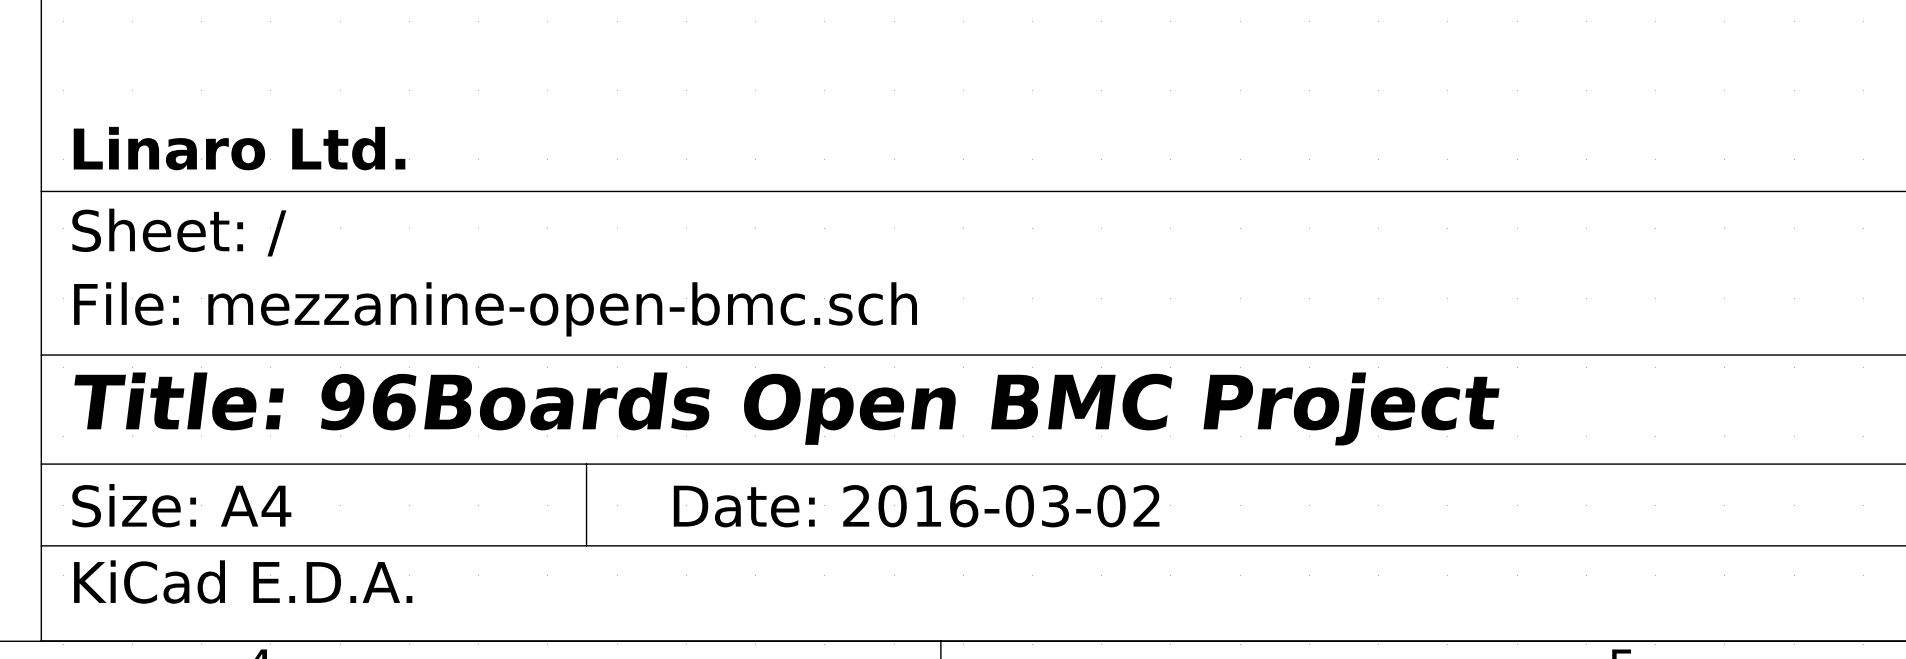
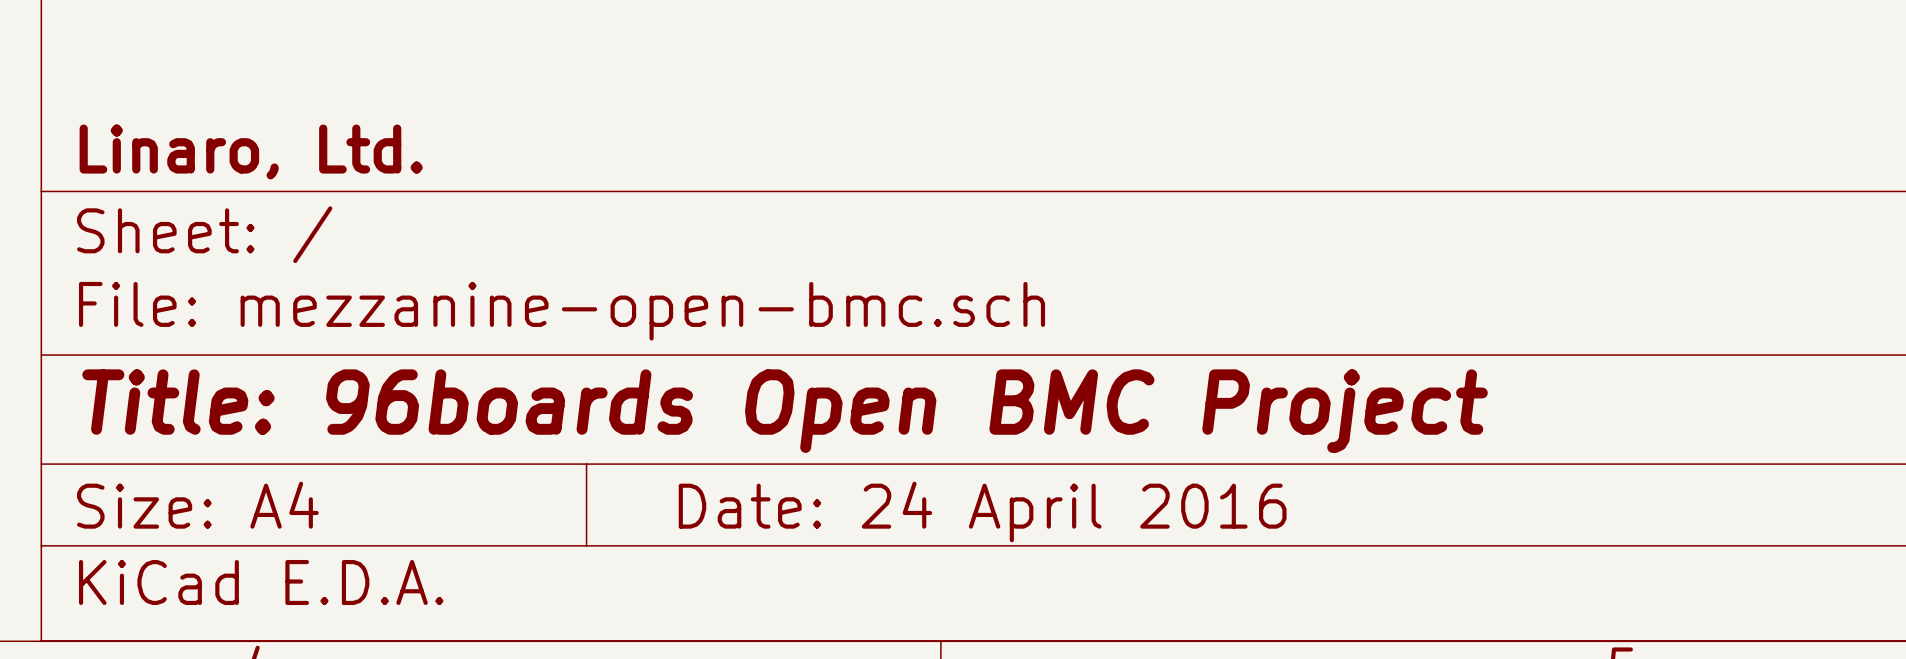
title block: Linaro Ltd. (239, 148) -> Linaro, Ltd. (251, 151)
title block: Title: 96Boards Open BMC Project (786, 408) -> Title: 96boards Open BMC Project (785, 411)
title block: Date: 2016-03-02 (916, 506) -> Date: 24 April 2016 (982, 512)

